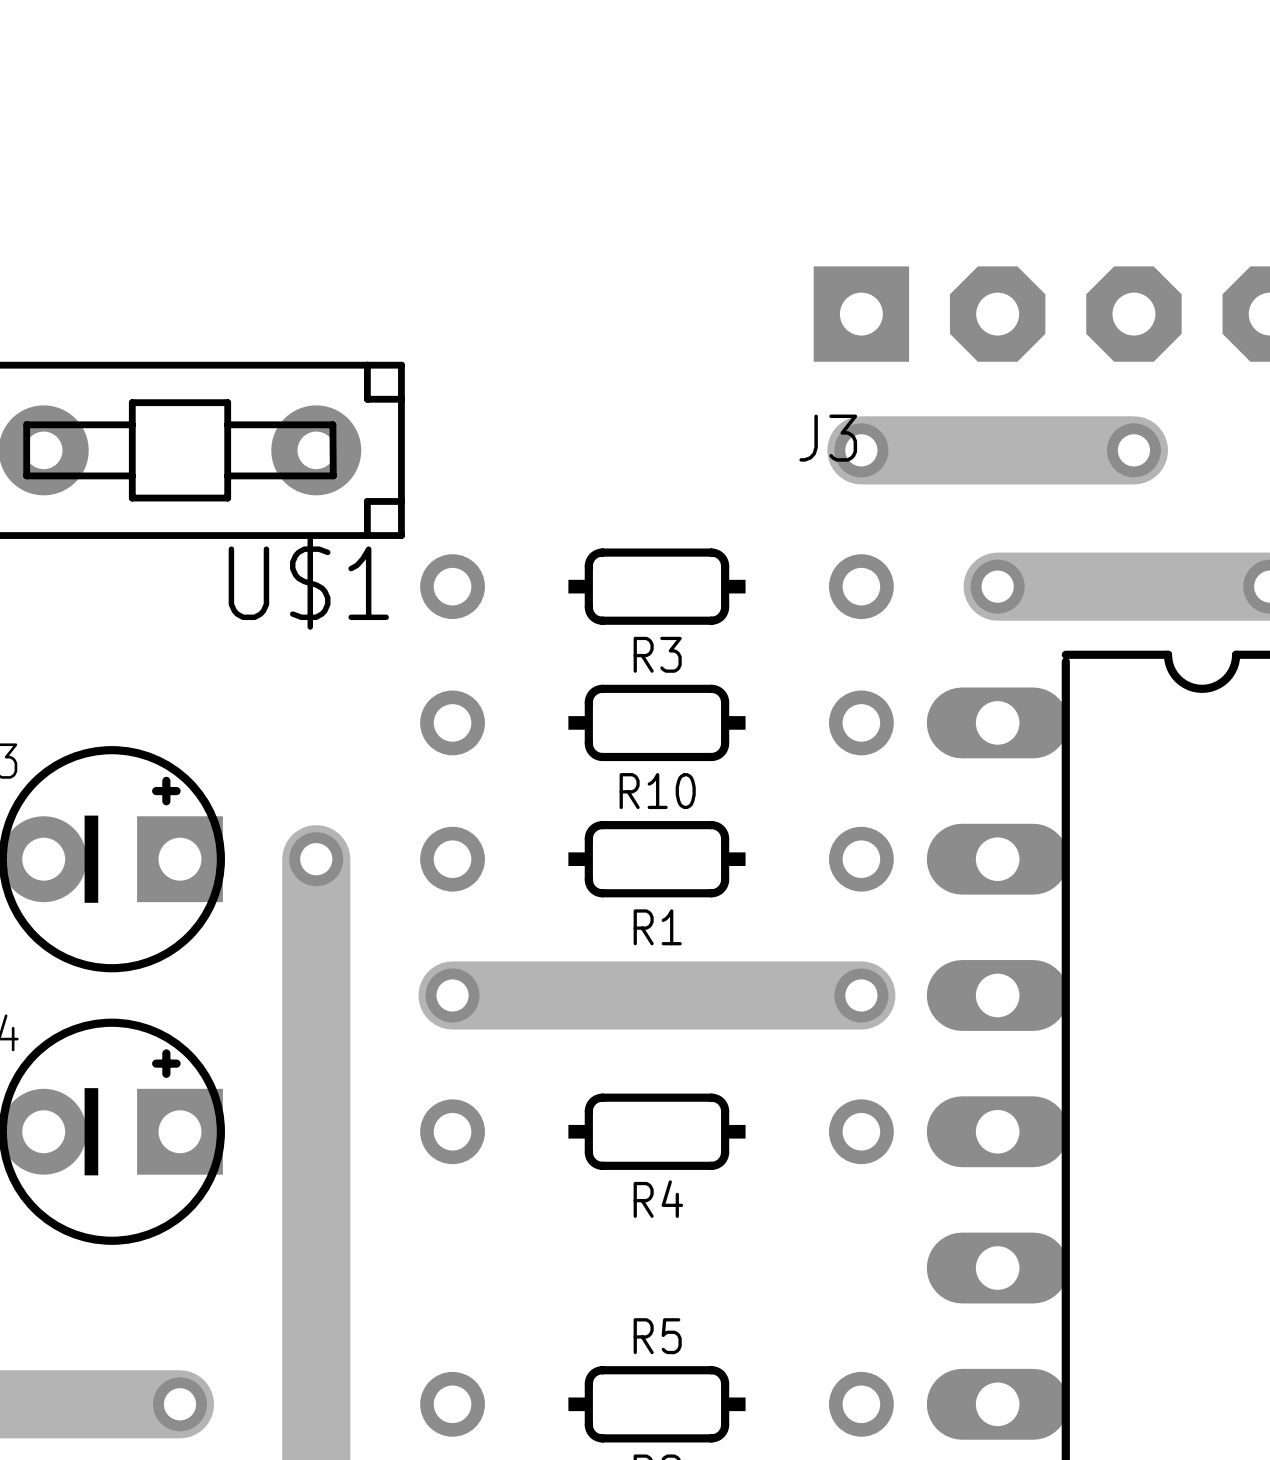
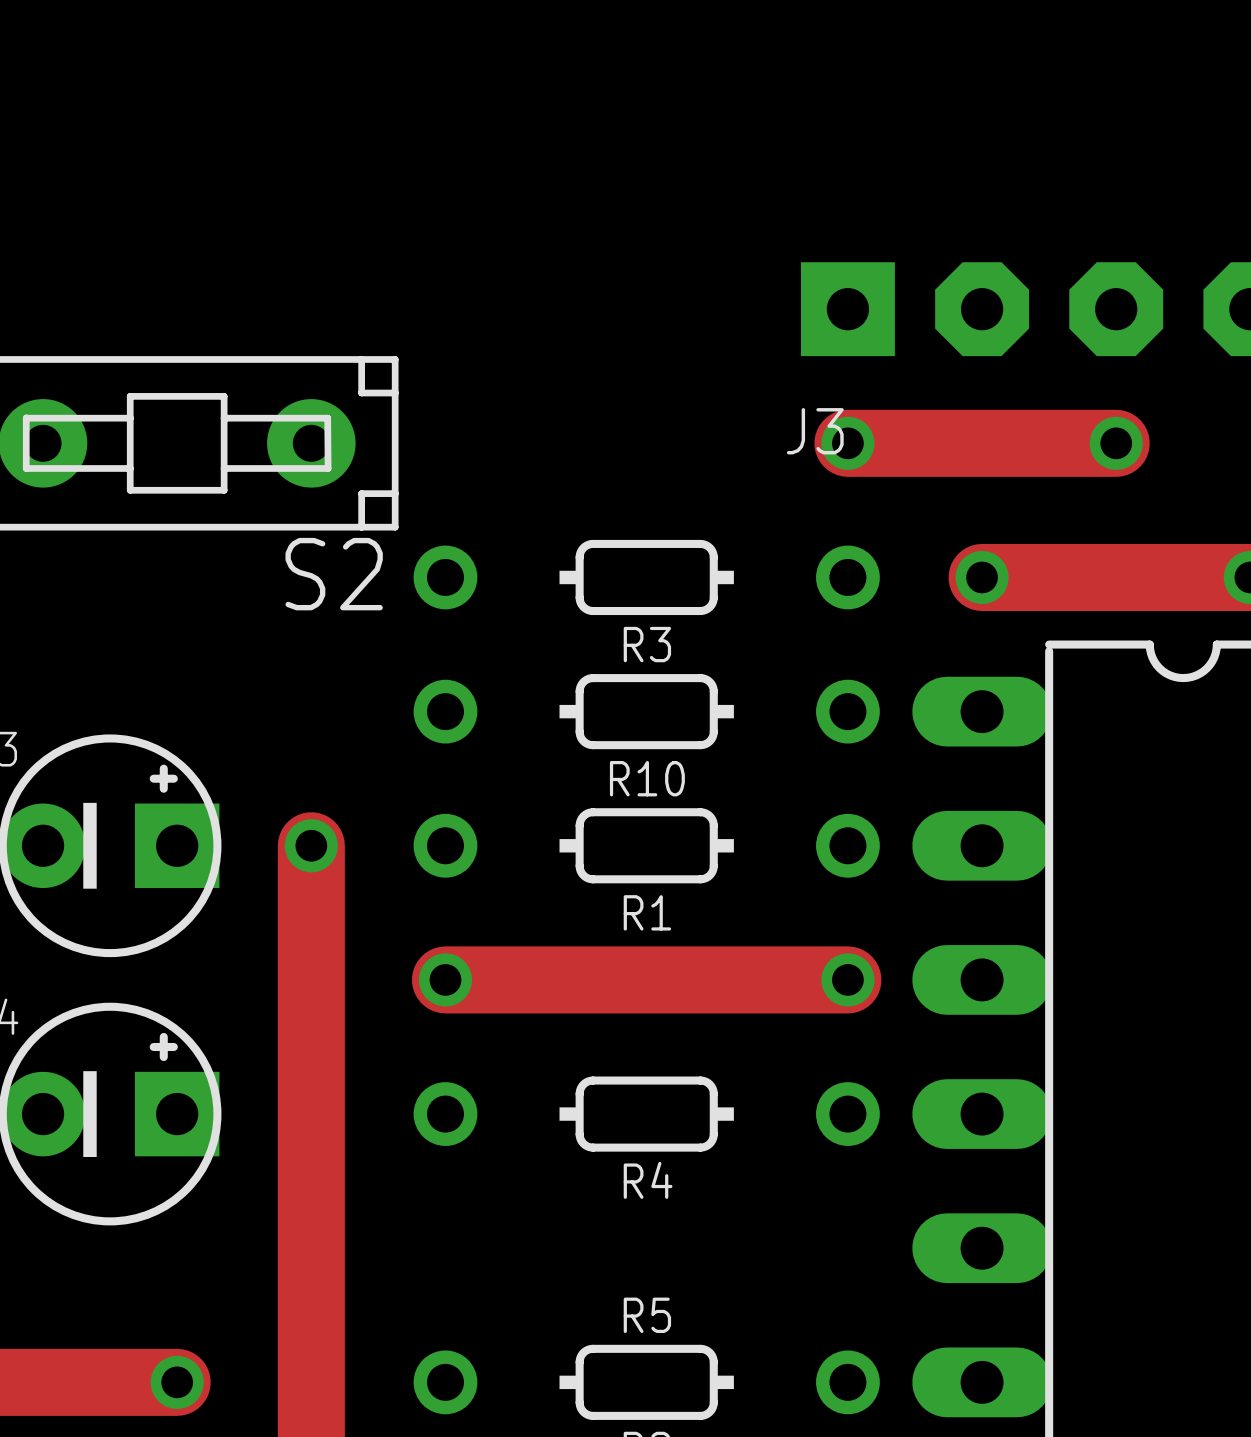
U$1 name: U$1 (308, 583) -> S2 (334, 574)

